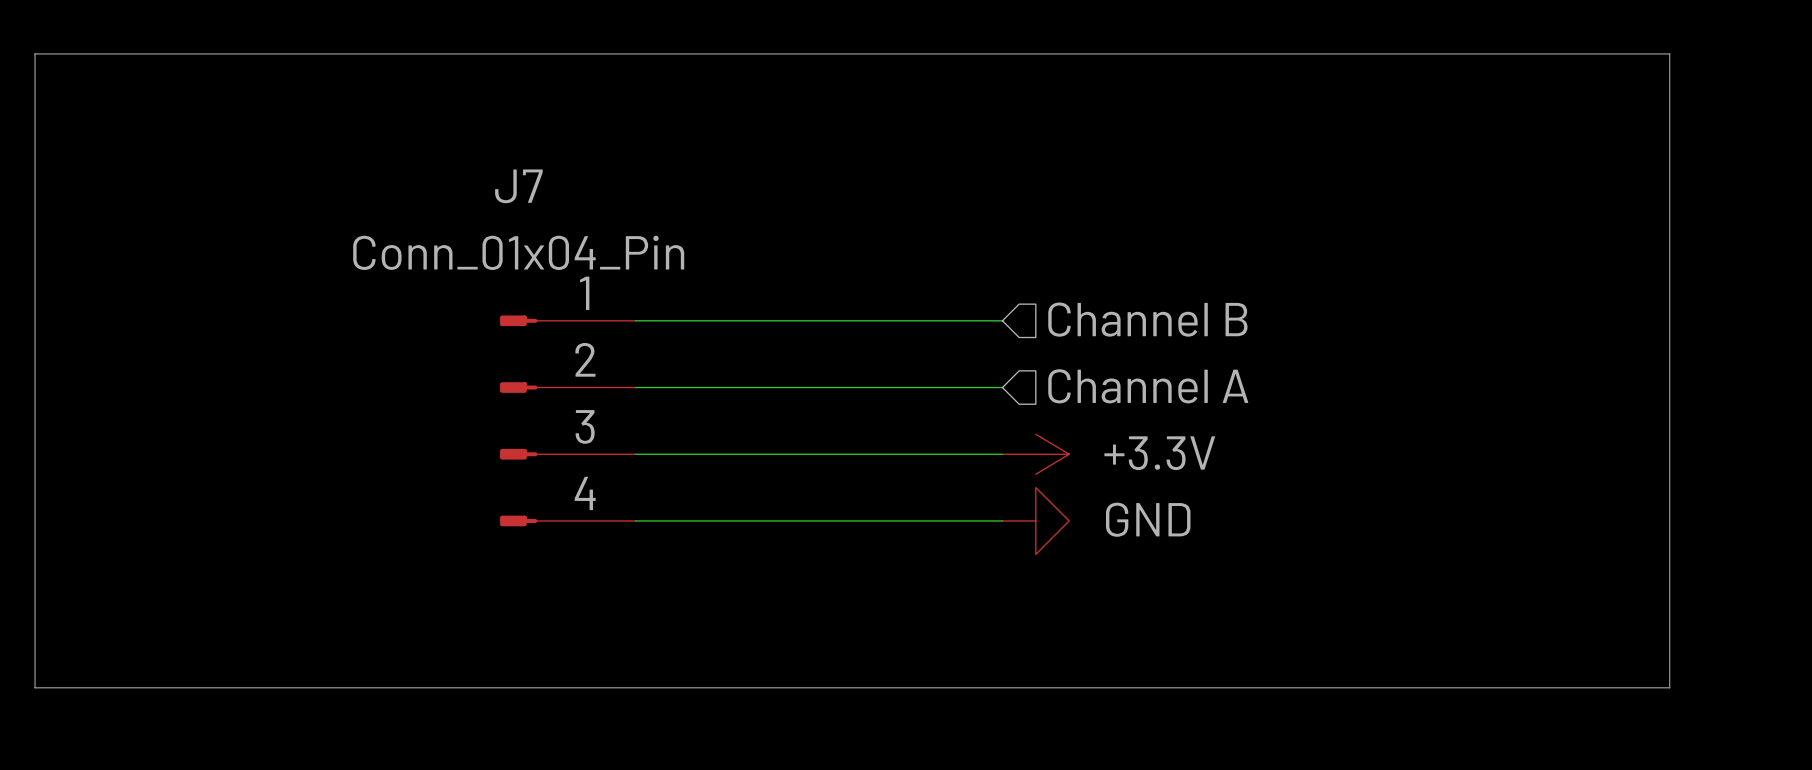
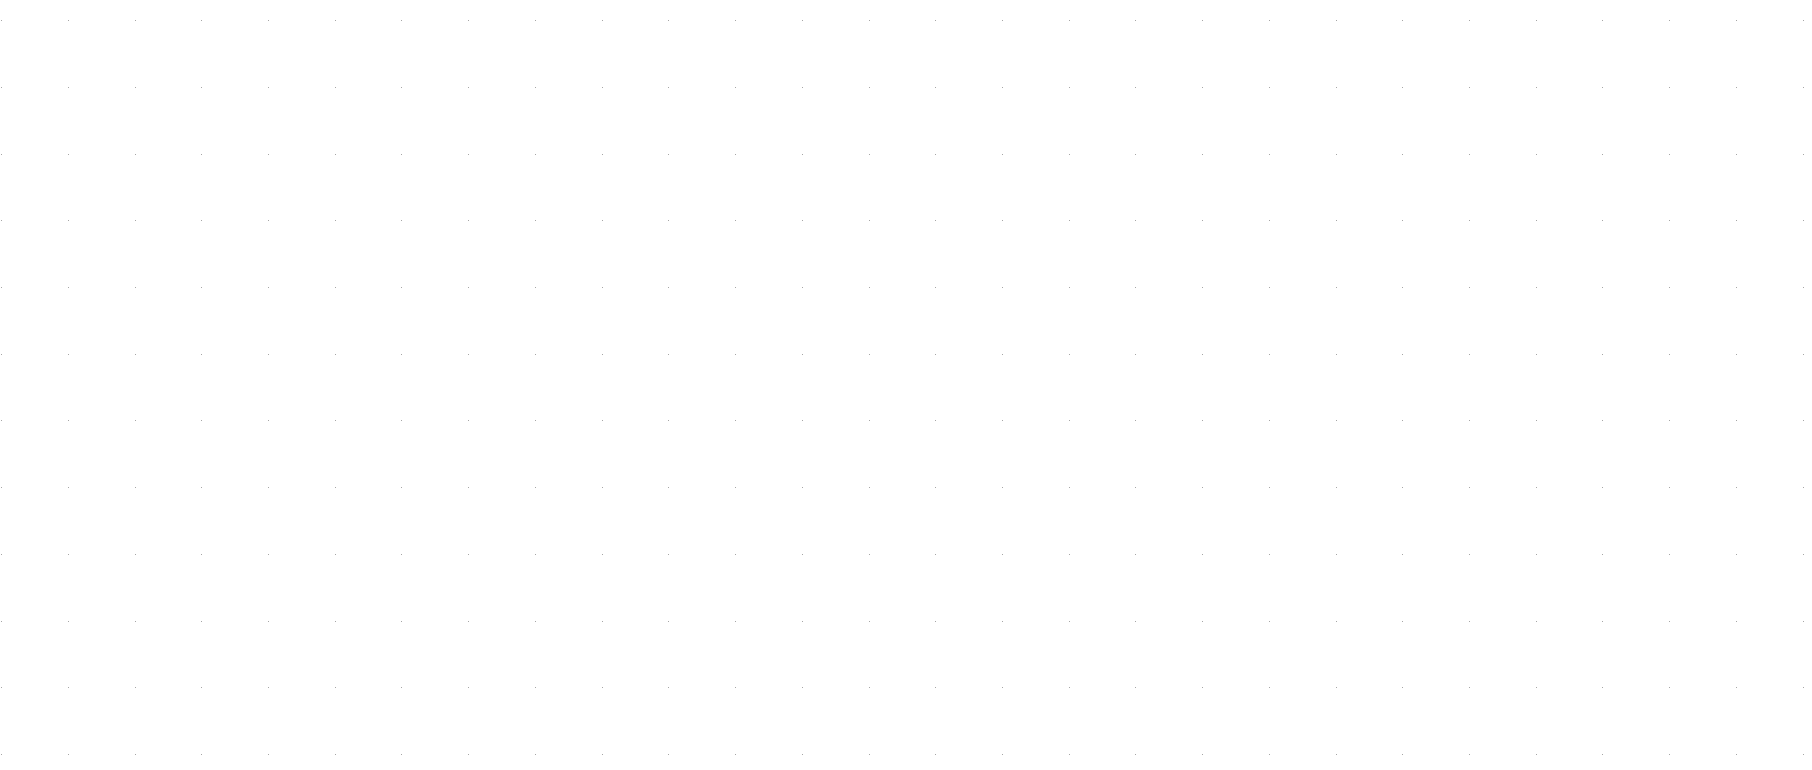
line: (35, 53) (1669, 53) (1669, 687) (35, 687) (35, 53) -> none
hierarchical label: Channel B (1147, 319) -> none
wire: (635, 320) (1002, 320) -> none
hierarchical label: Channel A (1148, 386) -> none
wire: (635, 387) (1002, 387) -> none
J7: Conn_01x04_Pin (567, 420) -> none
wire: (635, 454) (1002, 454) -> none
power symbol: +3.3V (1035, 454) -> none
wire: (635, 520) (1002, 520) -> none
power symbol: GND (1035, 520) -> none

